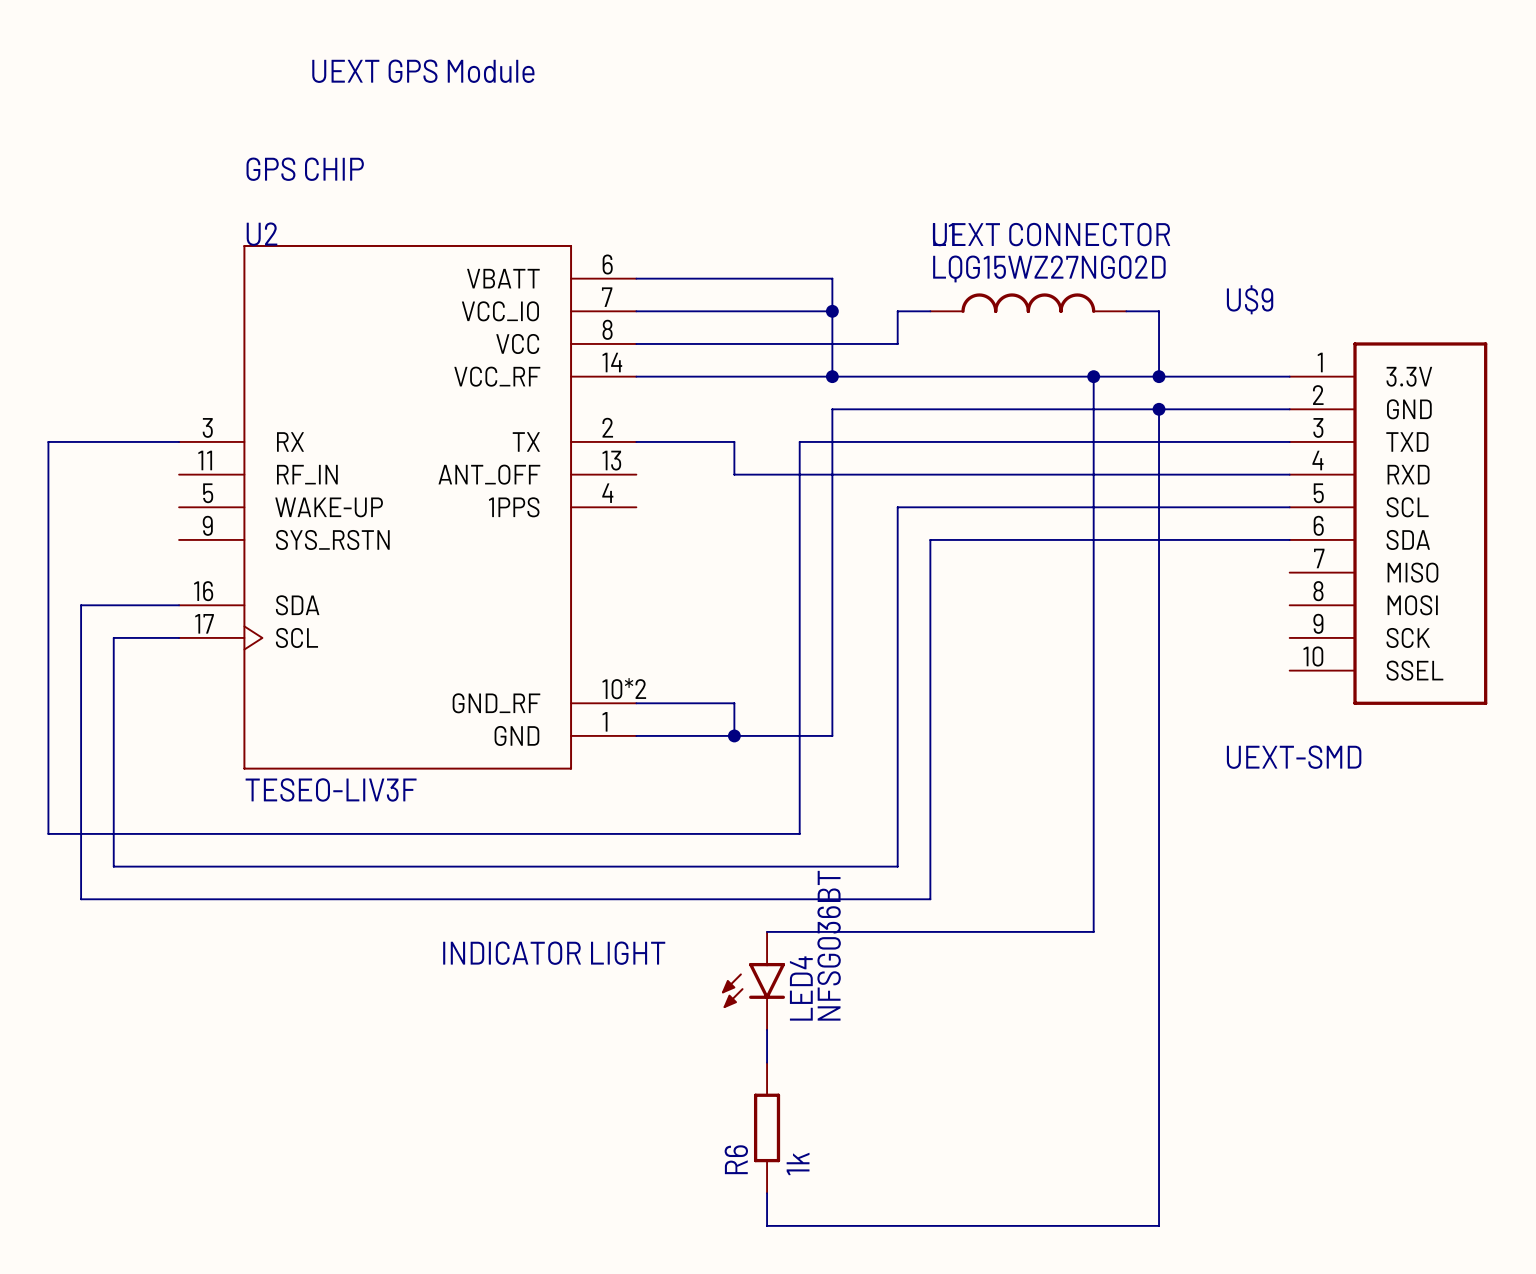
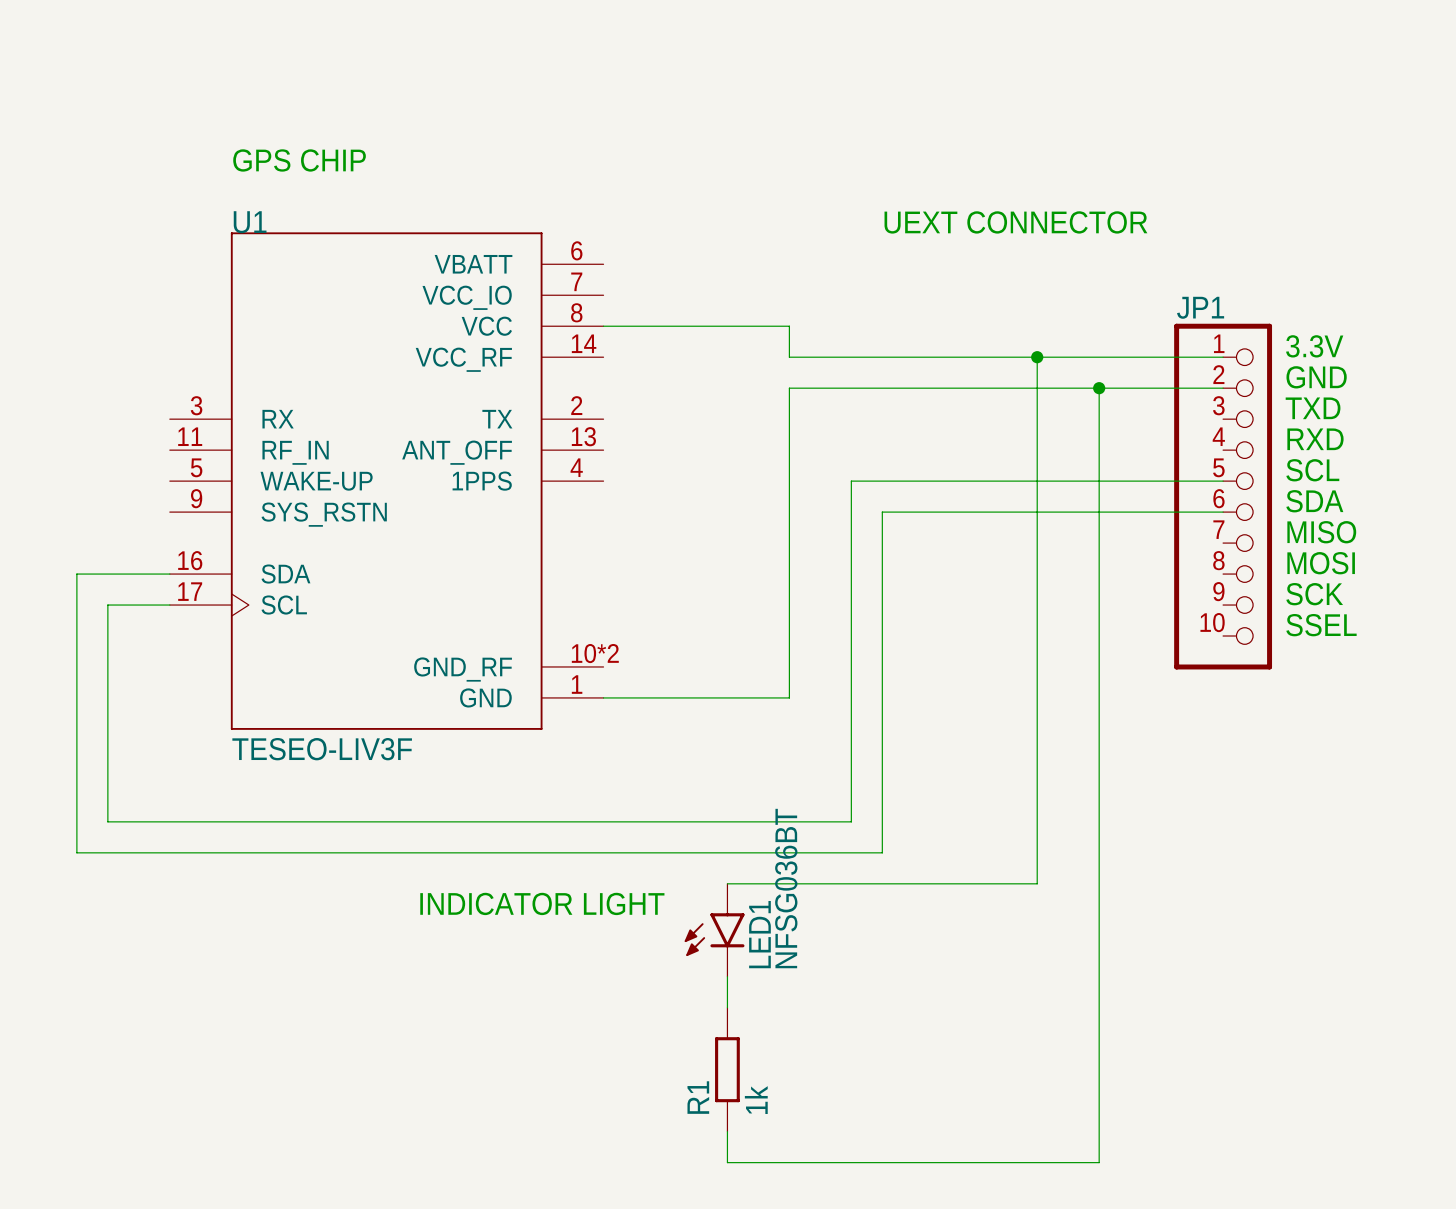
text: UEXT GPS Module (423, 71) -> none
U2 name: U2 (262, 234) -> U1 (250, 222)
wire: (636, 278) (832, 278) (832, 343) (897, 343) (897, 311) (930, 311) -> none
part: LQG15WZ27NG02D (1028, 303) -> none
wire: (636, 311) (832, 311) -> none
junction: (832, 311) -> none
wire: (1126, 311) (1159, 311) (1159, 376) -> none
text: none -> 3.3V (1314, 346)
wire: (636, 376) (832, 376) -> none
junction: (832, 376) -> none
junction: (1159, 376) -> none
text: none -> GND (1316, 377)
text: none -> TXD (1313, 408)
wire: (179, 441) (48, 441) (48, 833) (799, 833) (799, 441) (1289, 441) -> none
wire: (636, 441) (734, 441) (734, 474) (1289, 474) -> none
text: none -> RXD (1315, 439)
text: none -> SCL (1312, 470)
JP1: none -> (1223, 496)
U$9: UEXT-SMD (1388, 523) -> none
text: none -> SDA (1314, 501)
text: none -> MISO (1321, 532)
text: none -> MOSI (1321, 563)
text: none -> SCK (1314, 594)
text: none -> SSEL (1321, 625)
wire: (636, 703) (734, 703) (734, 735) -> none
junction: (734, 735) -> none
LED4 name: LED4 (801, 988) -> LED1 (759, 934)
R6 name: R6 (736, 1159) -> R1 (698, 1097)

